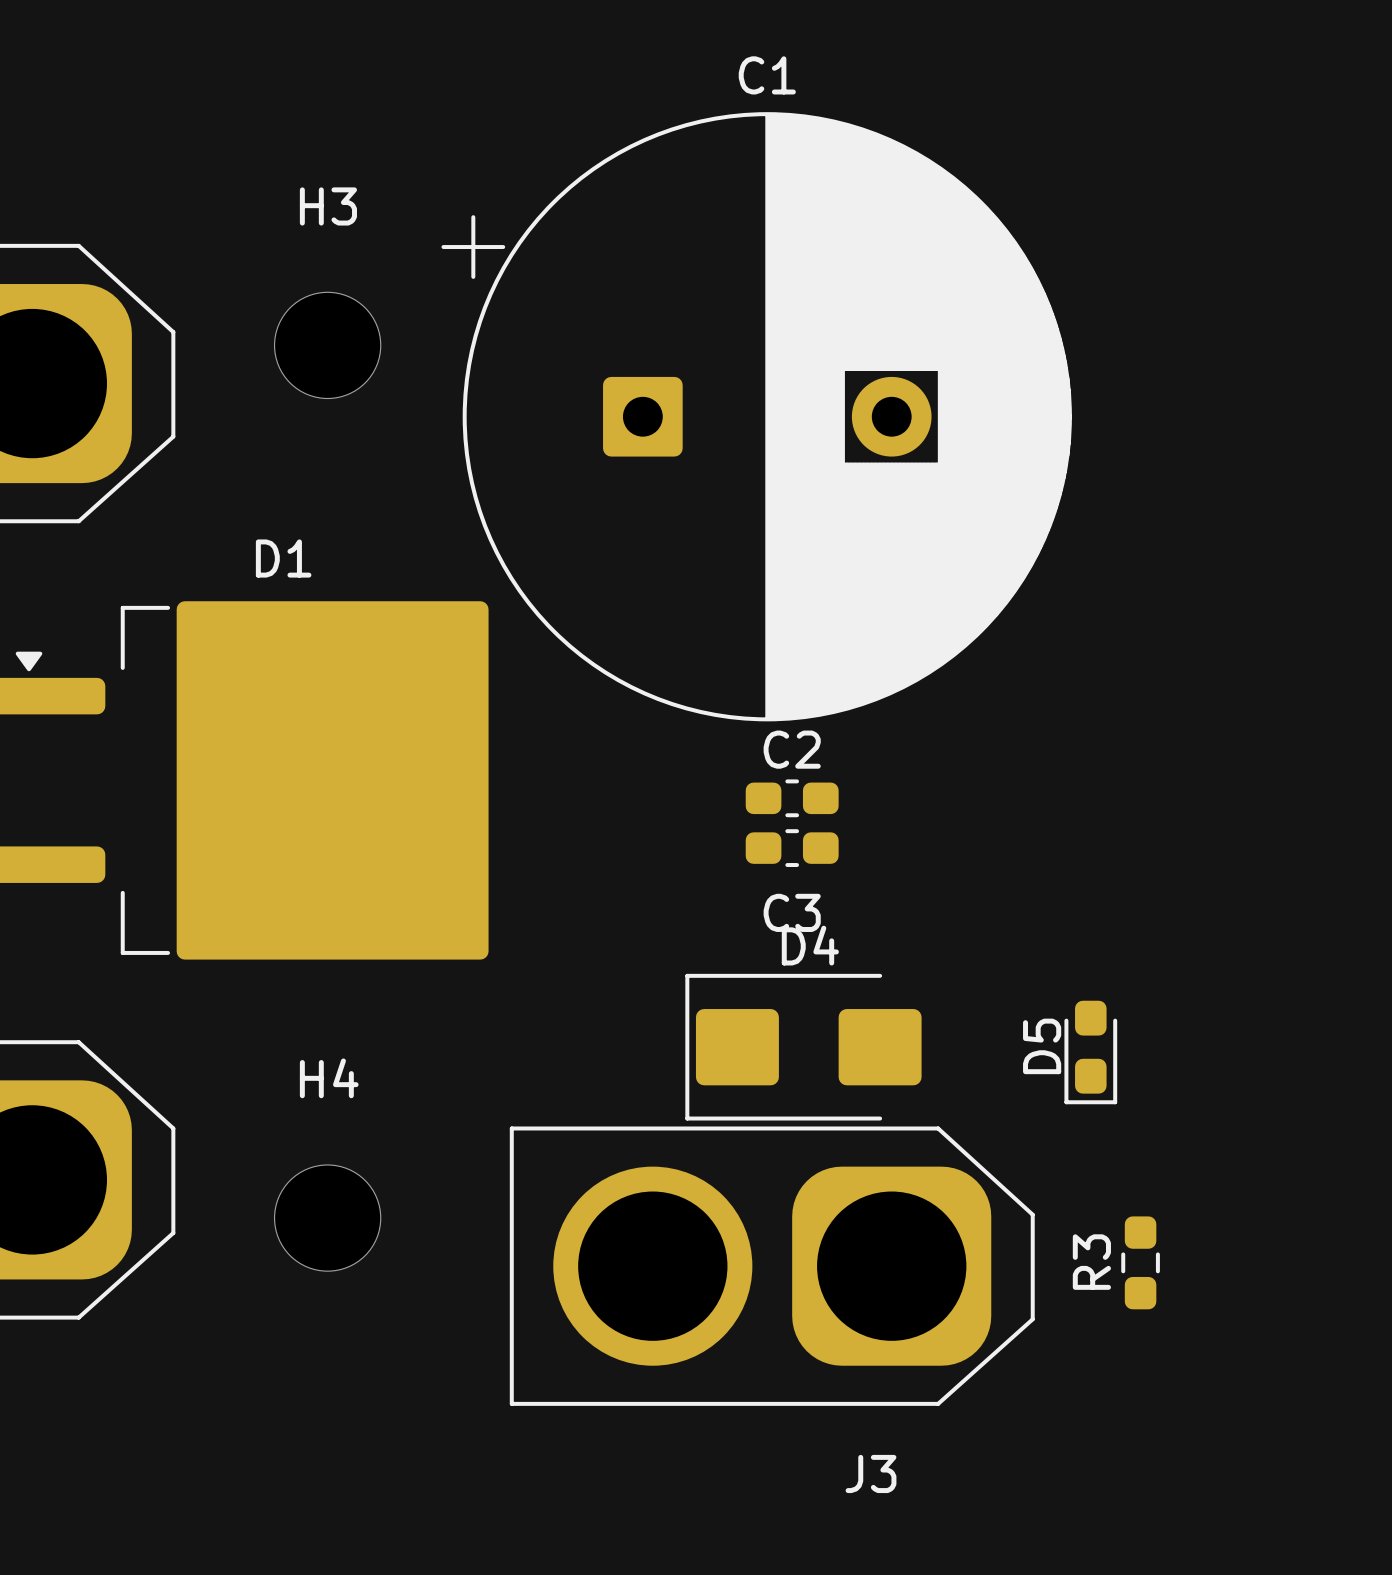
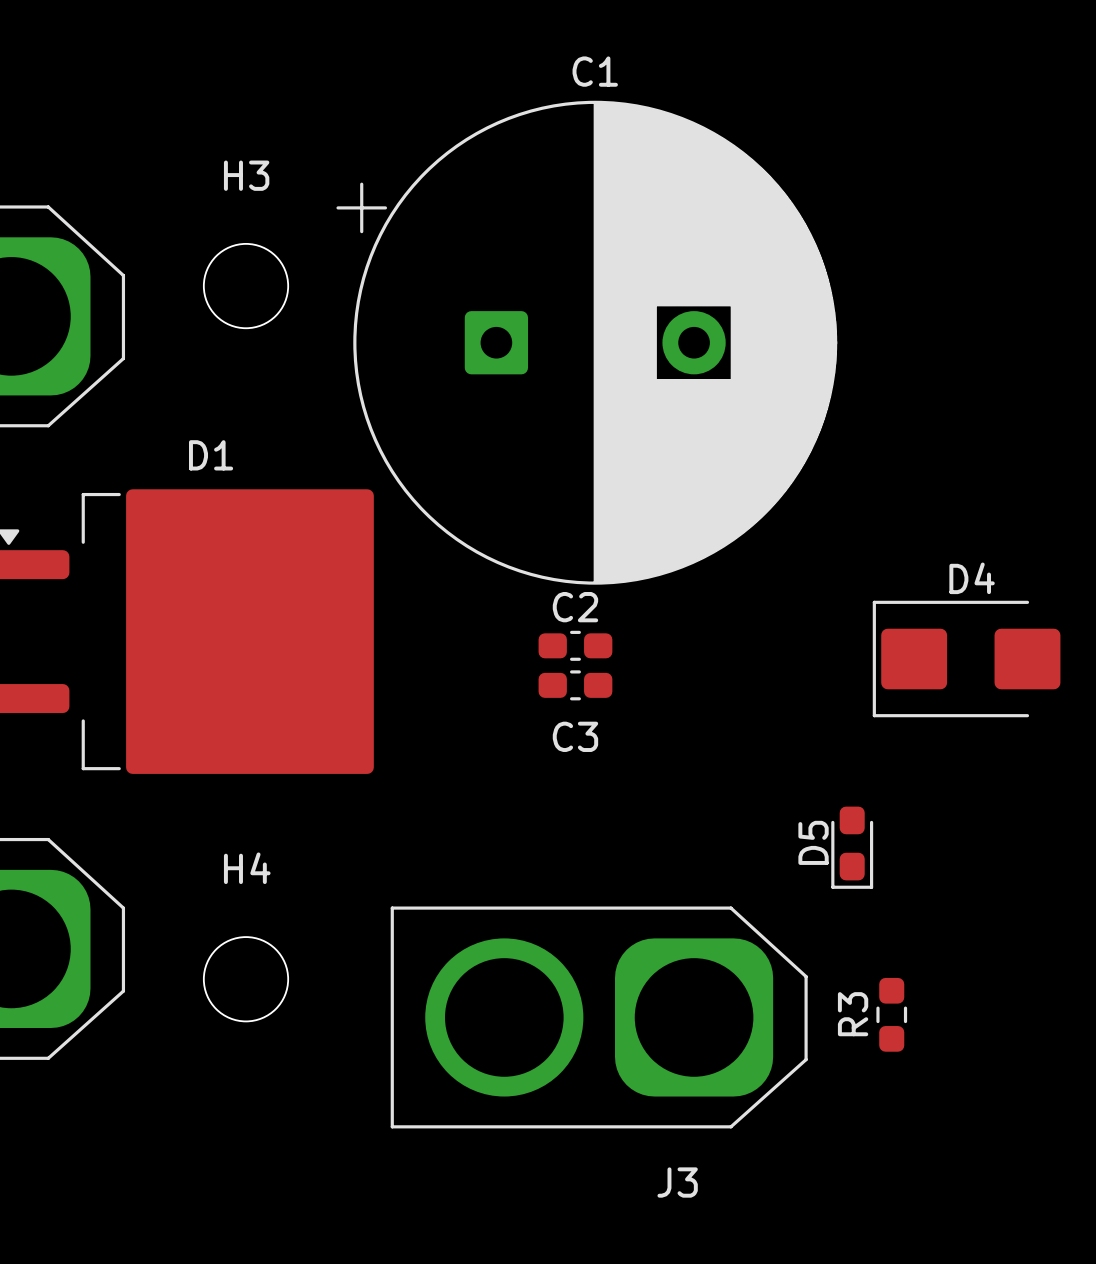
C2 position: (792, 798) -> (575, 645)
C3 position: (792, 848) -> (575, 685)
D4 position: (803, 1047) -> (966, 659)

